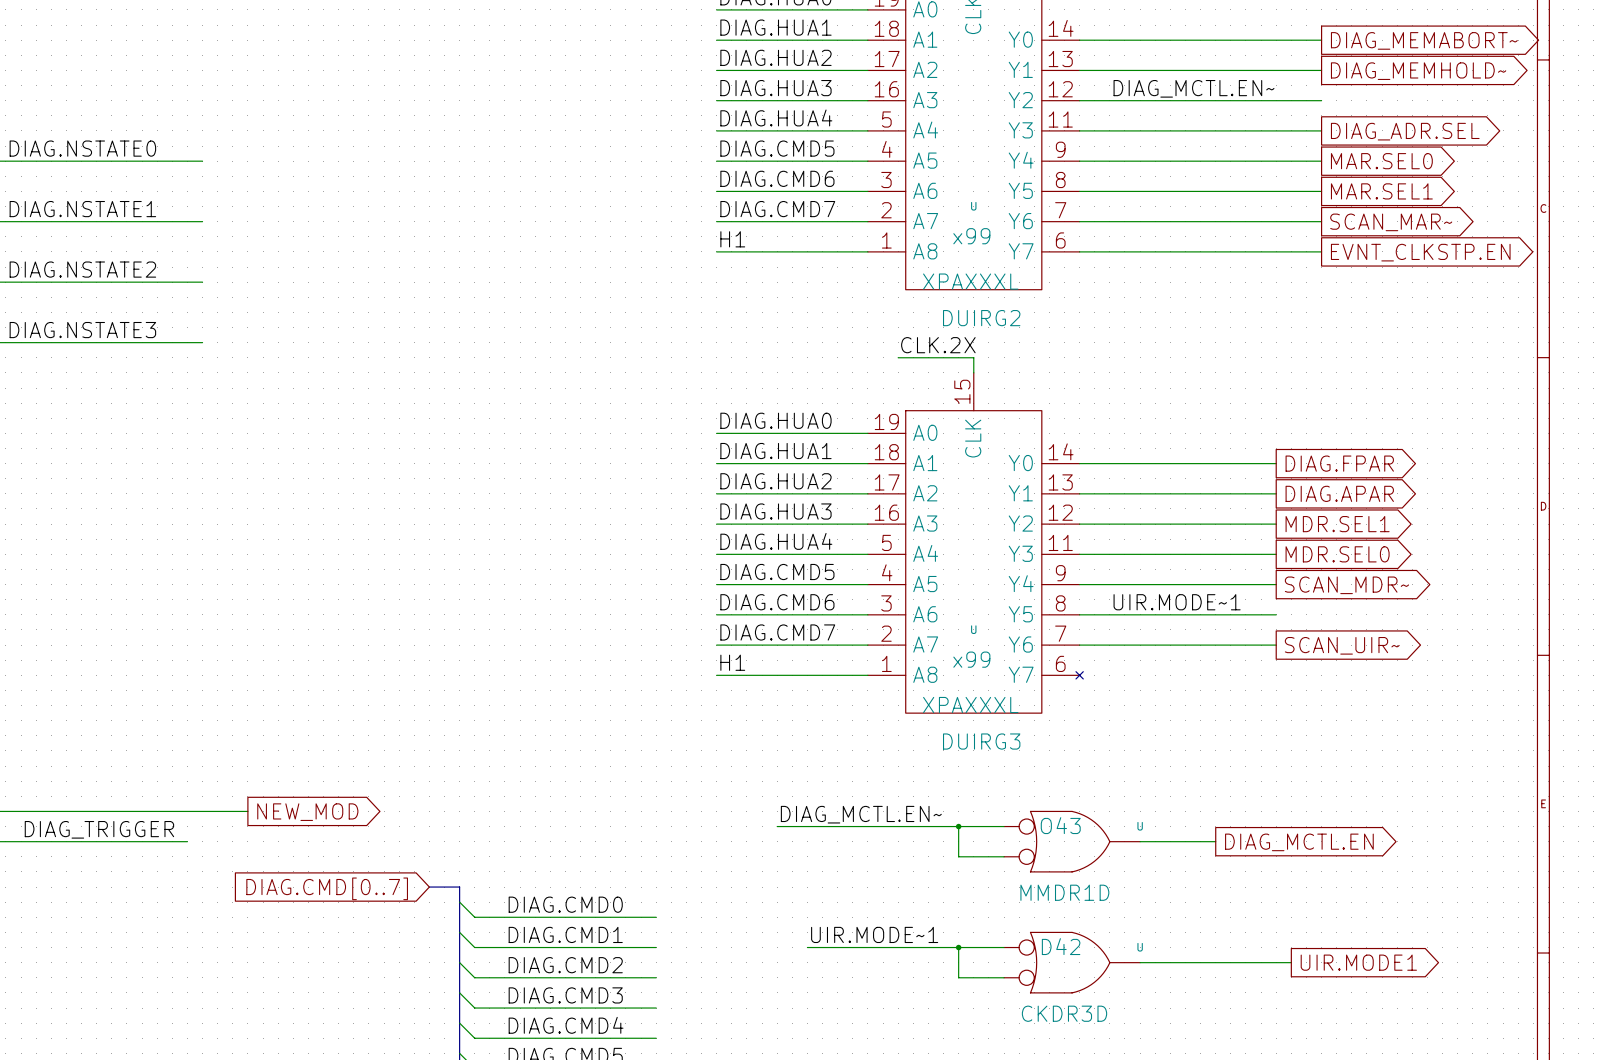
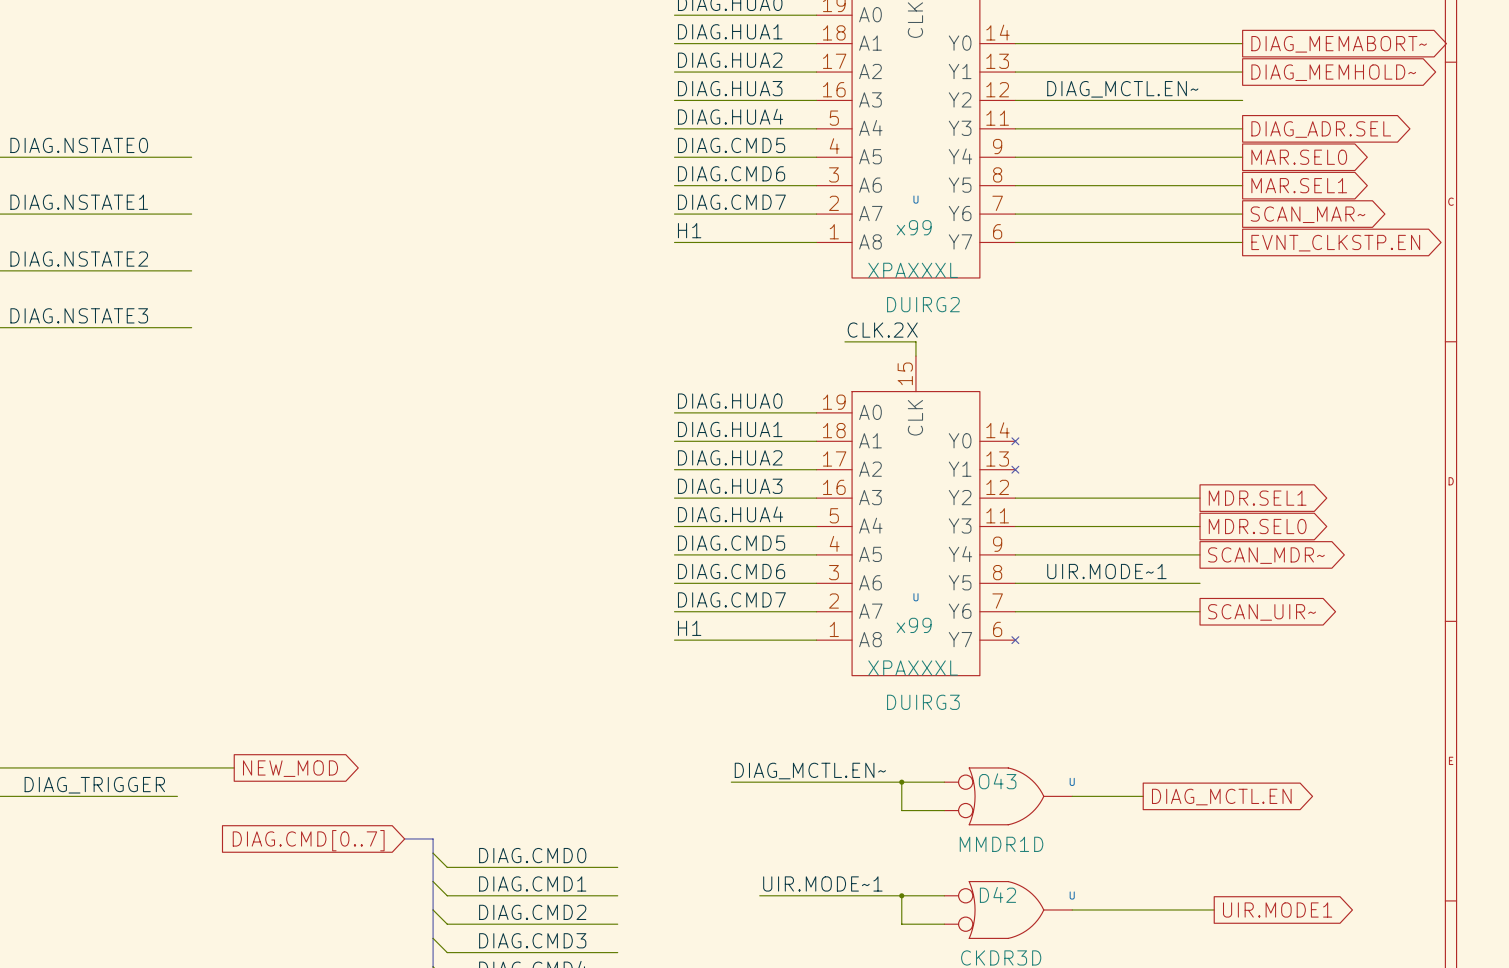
wire: (1079, 463) (1276, 463) -> none
no-connect mark: none -> (1015, 441)
global label: DIAG.FPAR (1339, 463) -> none
wire: (1079, 493) (1276, 493) -> none
no-connect mark: none -> (1015, 469)
global label: DIAG.APAR (1339, 493) -> none

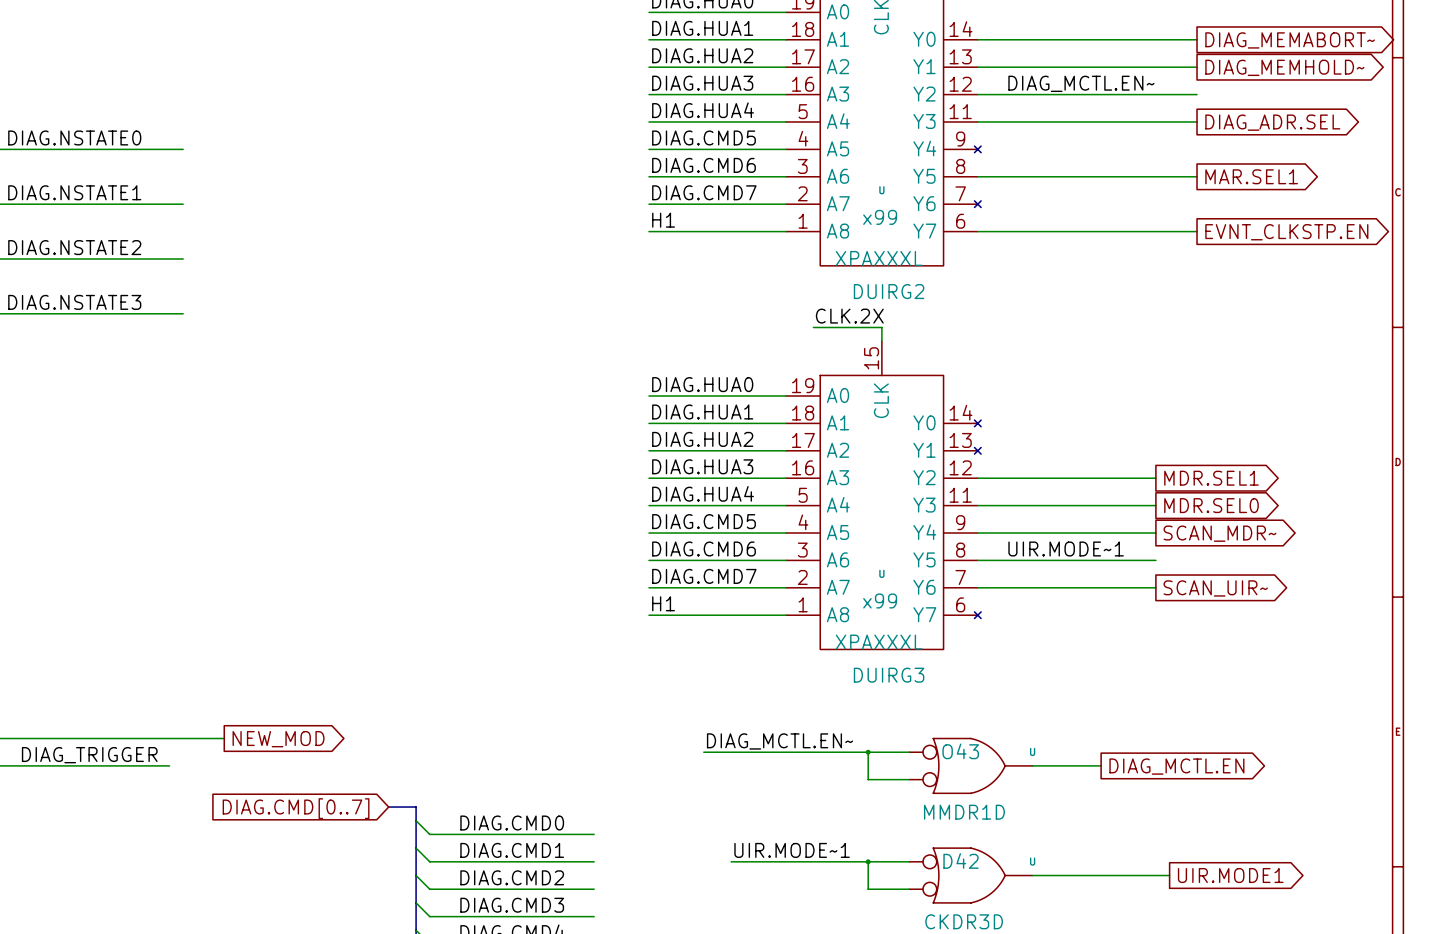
wire: (1015, 157) (1242, 157) -> none
no-connect mark: none -> (977, 149)
global label: MAR.SEL0 (1299, 157) -> none
wire: (1015, 214) (1242, 214) -> none
no-connect mark: none -> (977, 204)
global label: SCAN_MAR~ (1308, 214) -> none

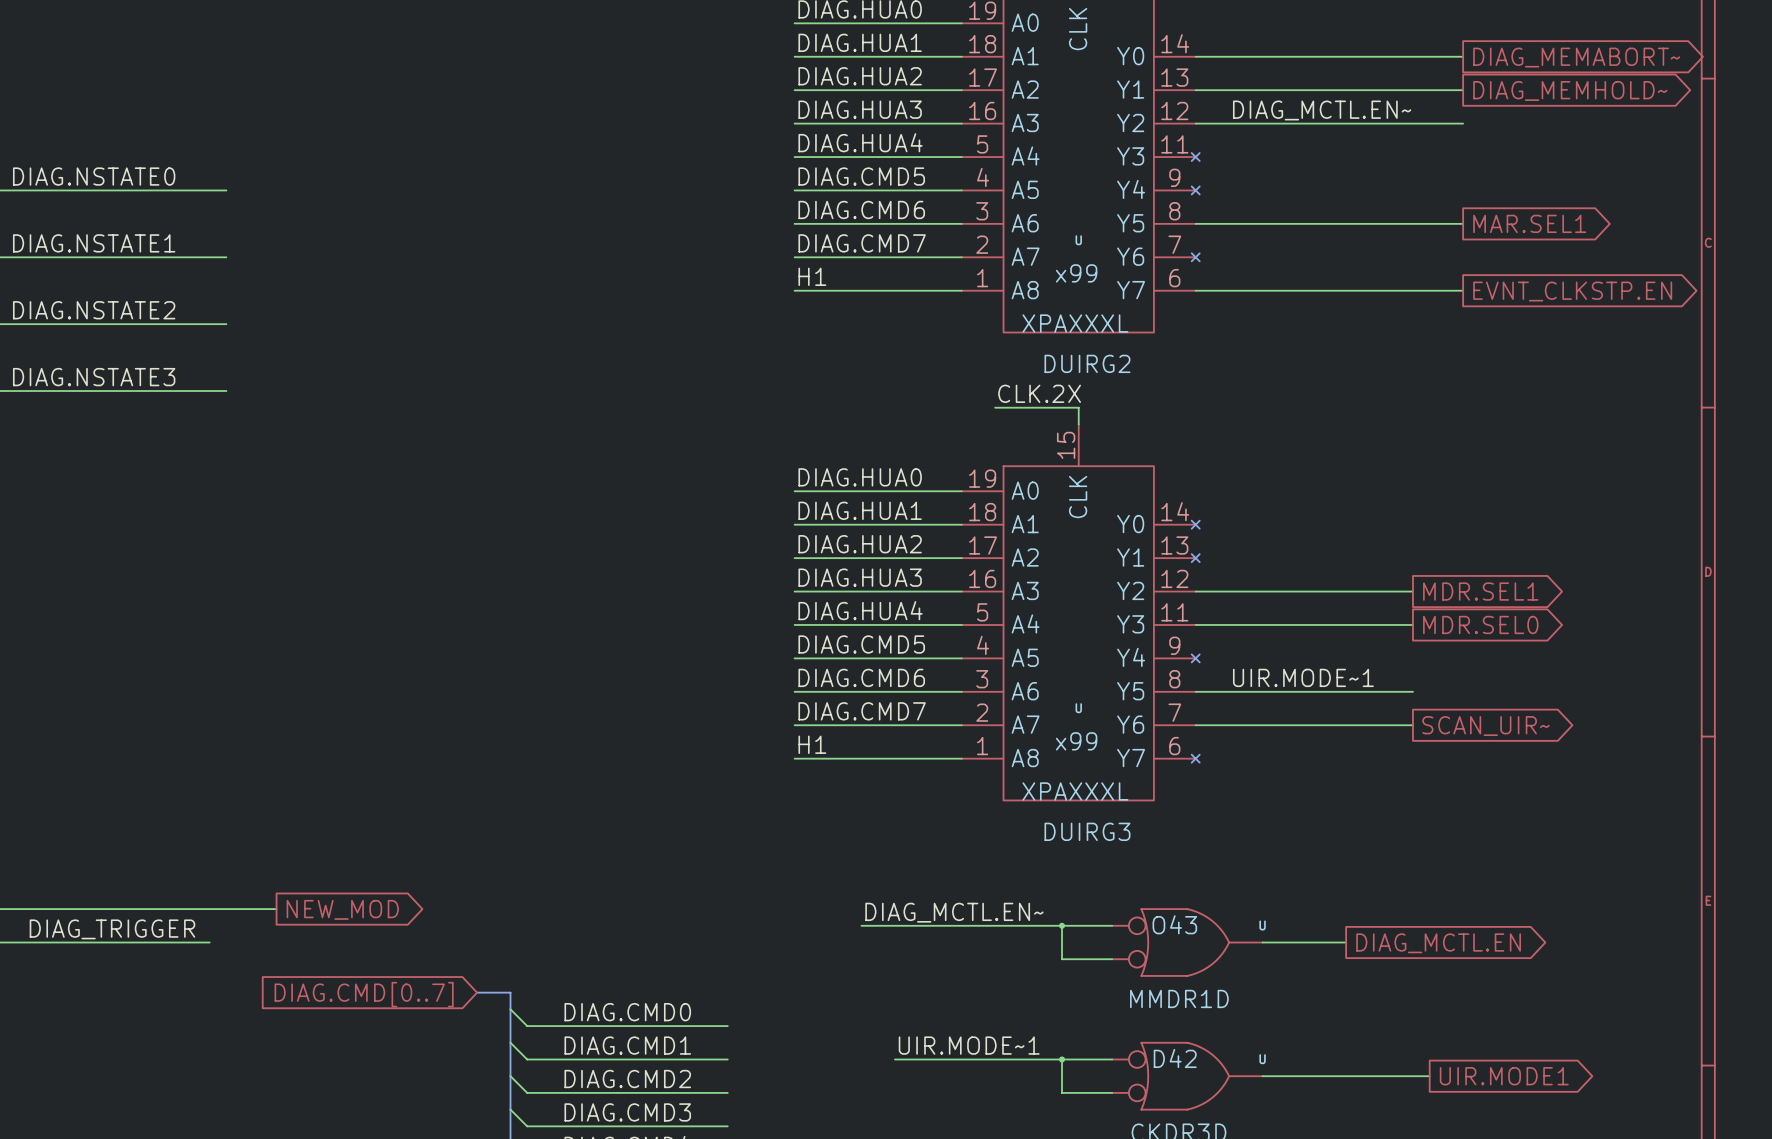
wire: (977, 121) (1197, 121) -> none
no-connect mark: none -> (1195, 157)
global label: DIAG_ADR.SEL (1272, 122) -> none
wire: (977, 533) (1155, 533) -> none
no-connect mark: none -> (1195, 658)
global label: SCAN_MDR~ (1219, 533) -> none

